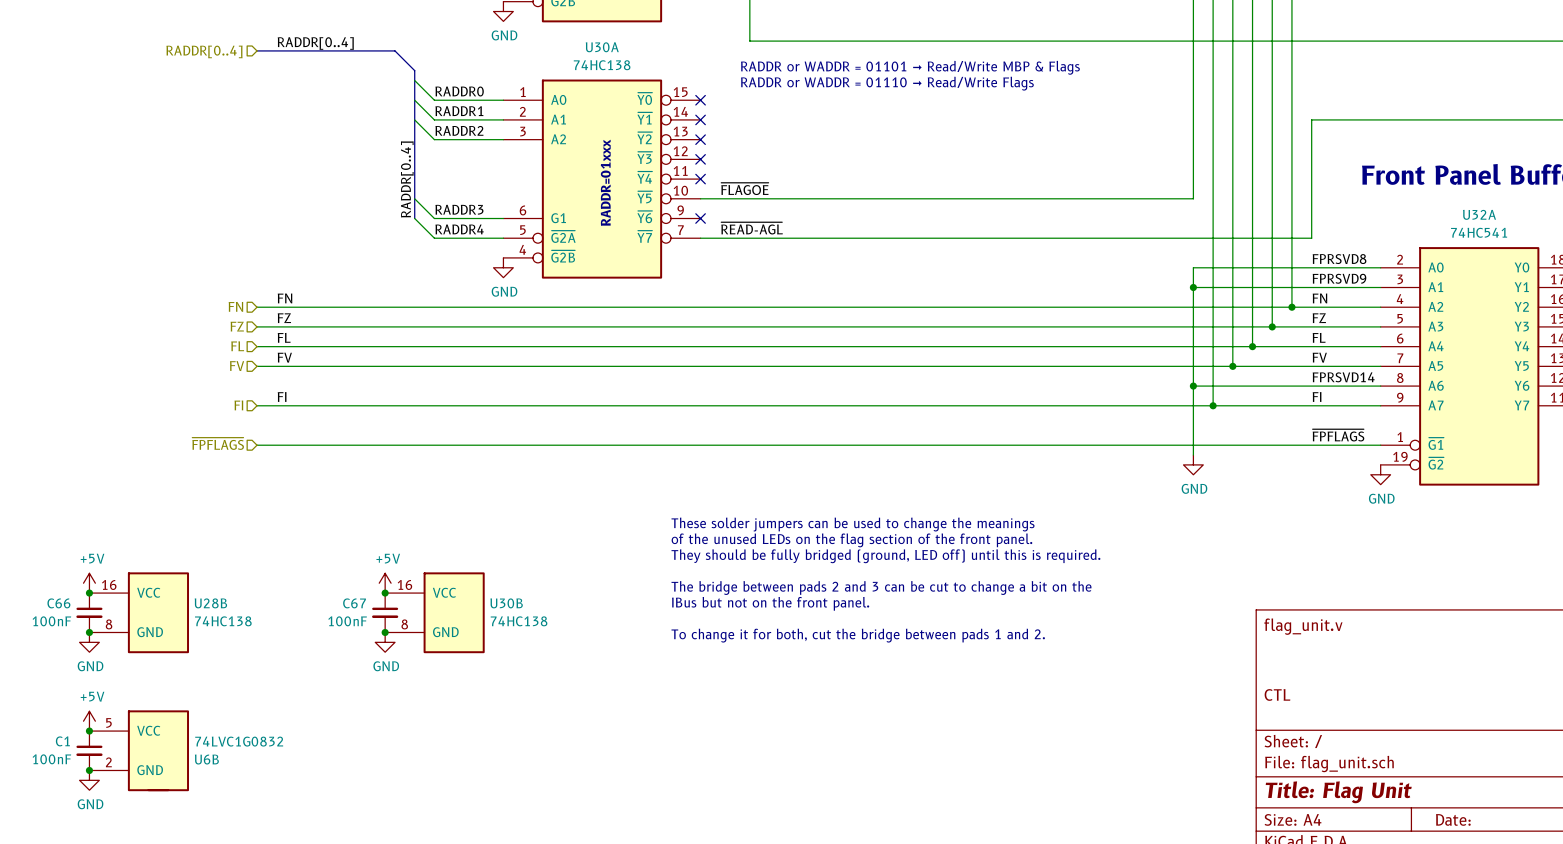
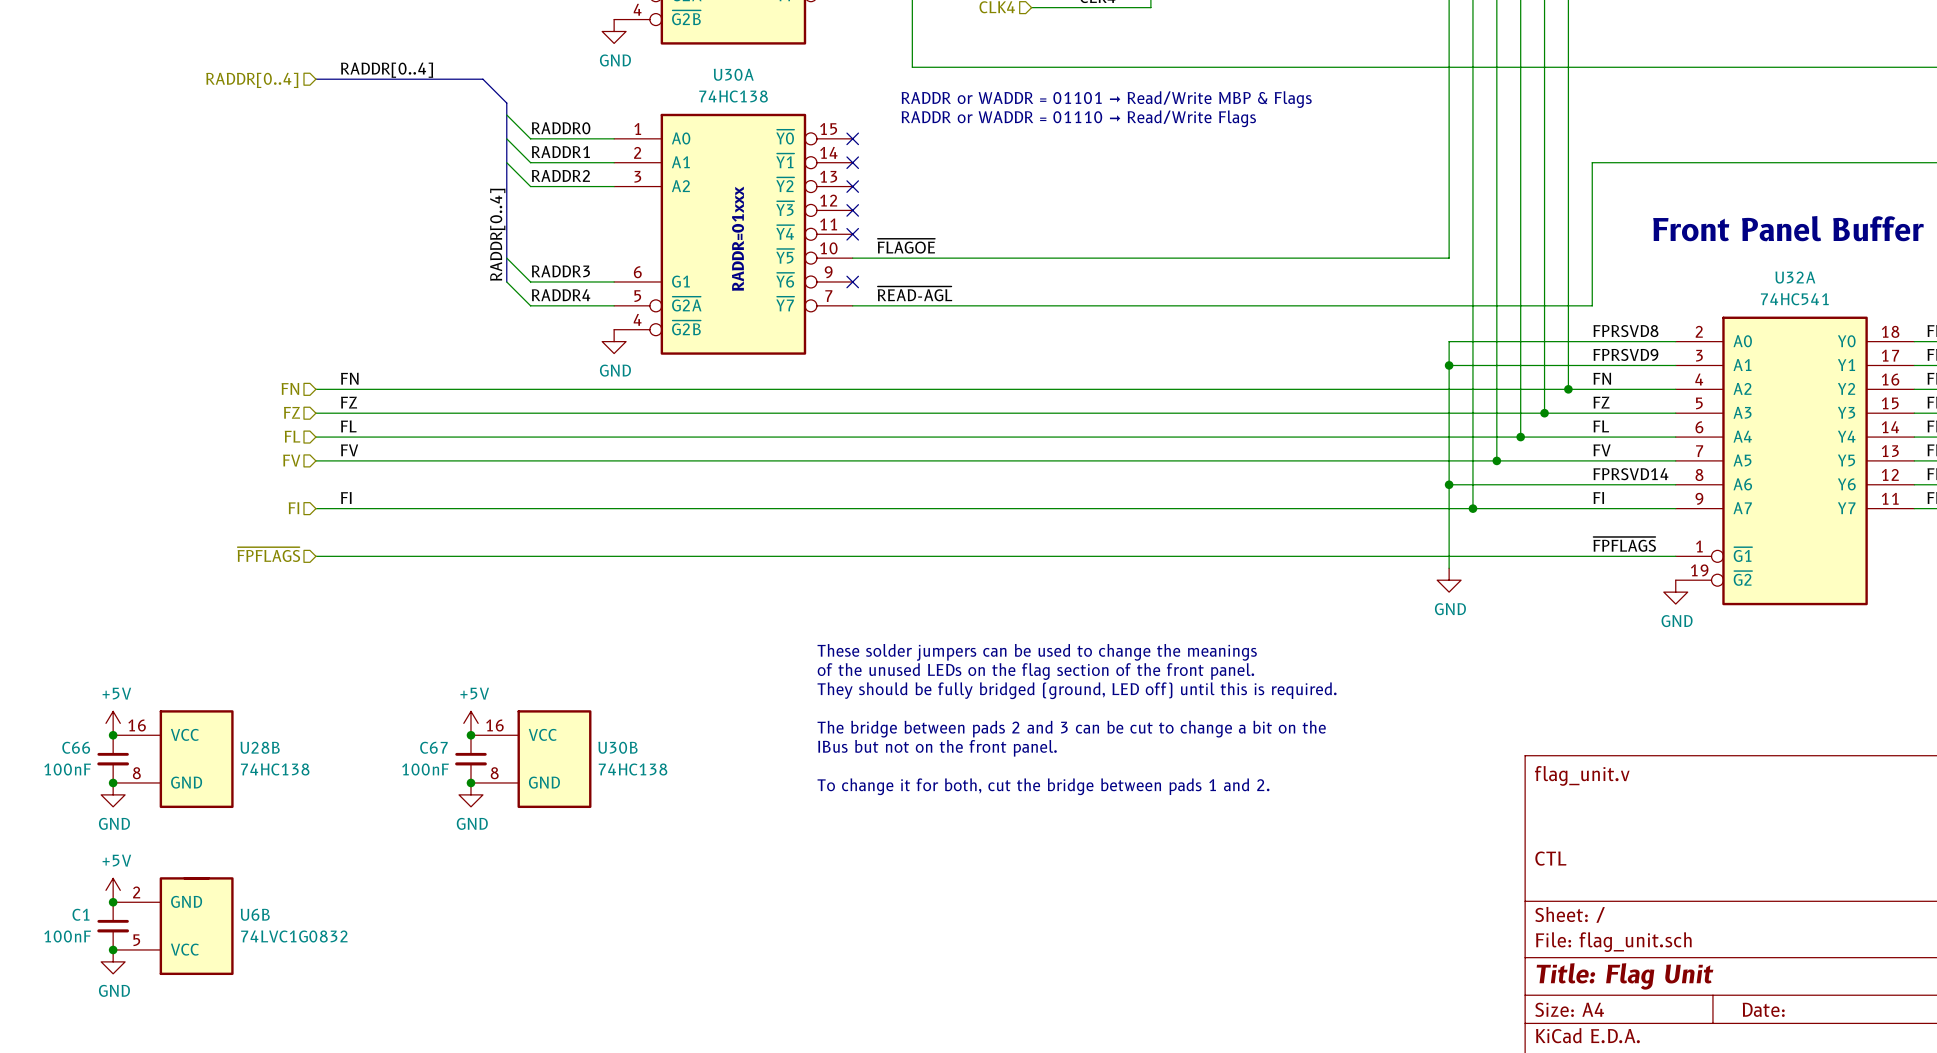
U6B flip: as is (158, 750) -> up-down (196, 926)

